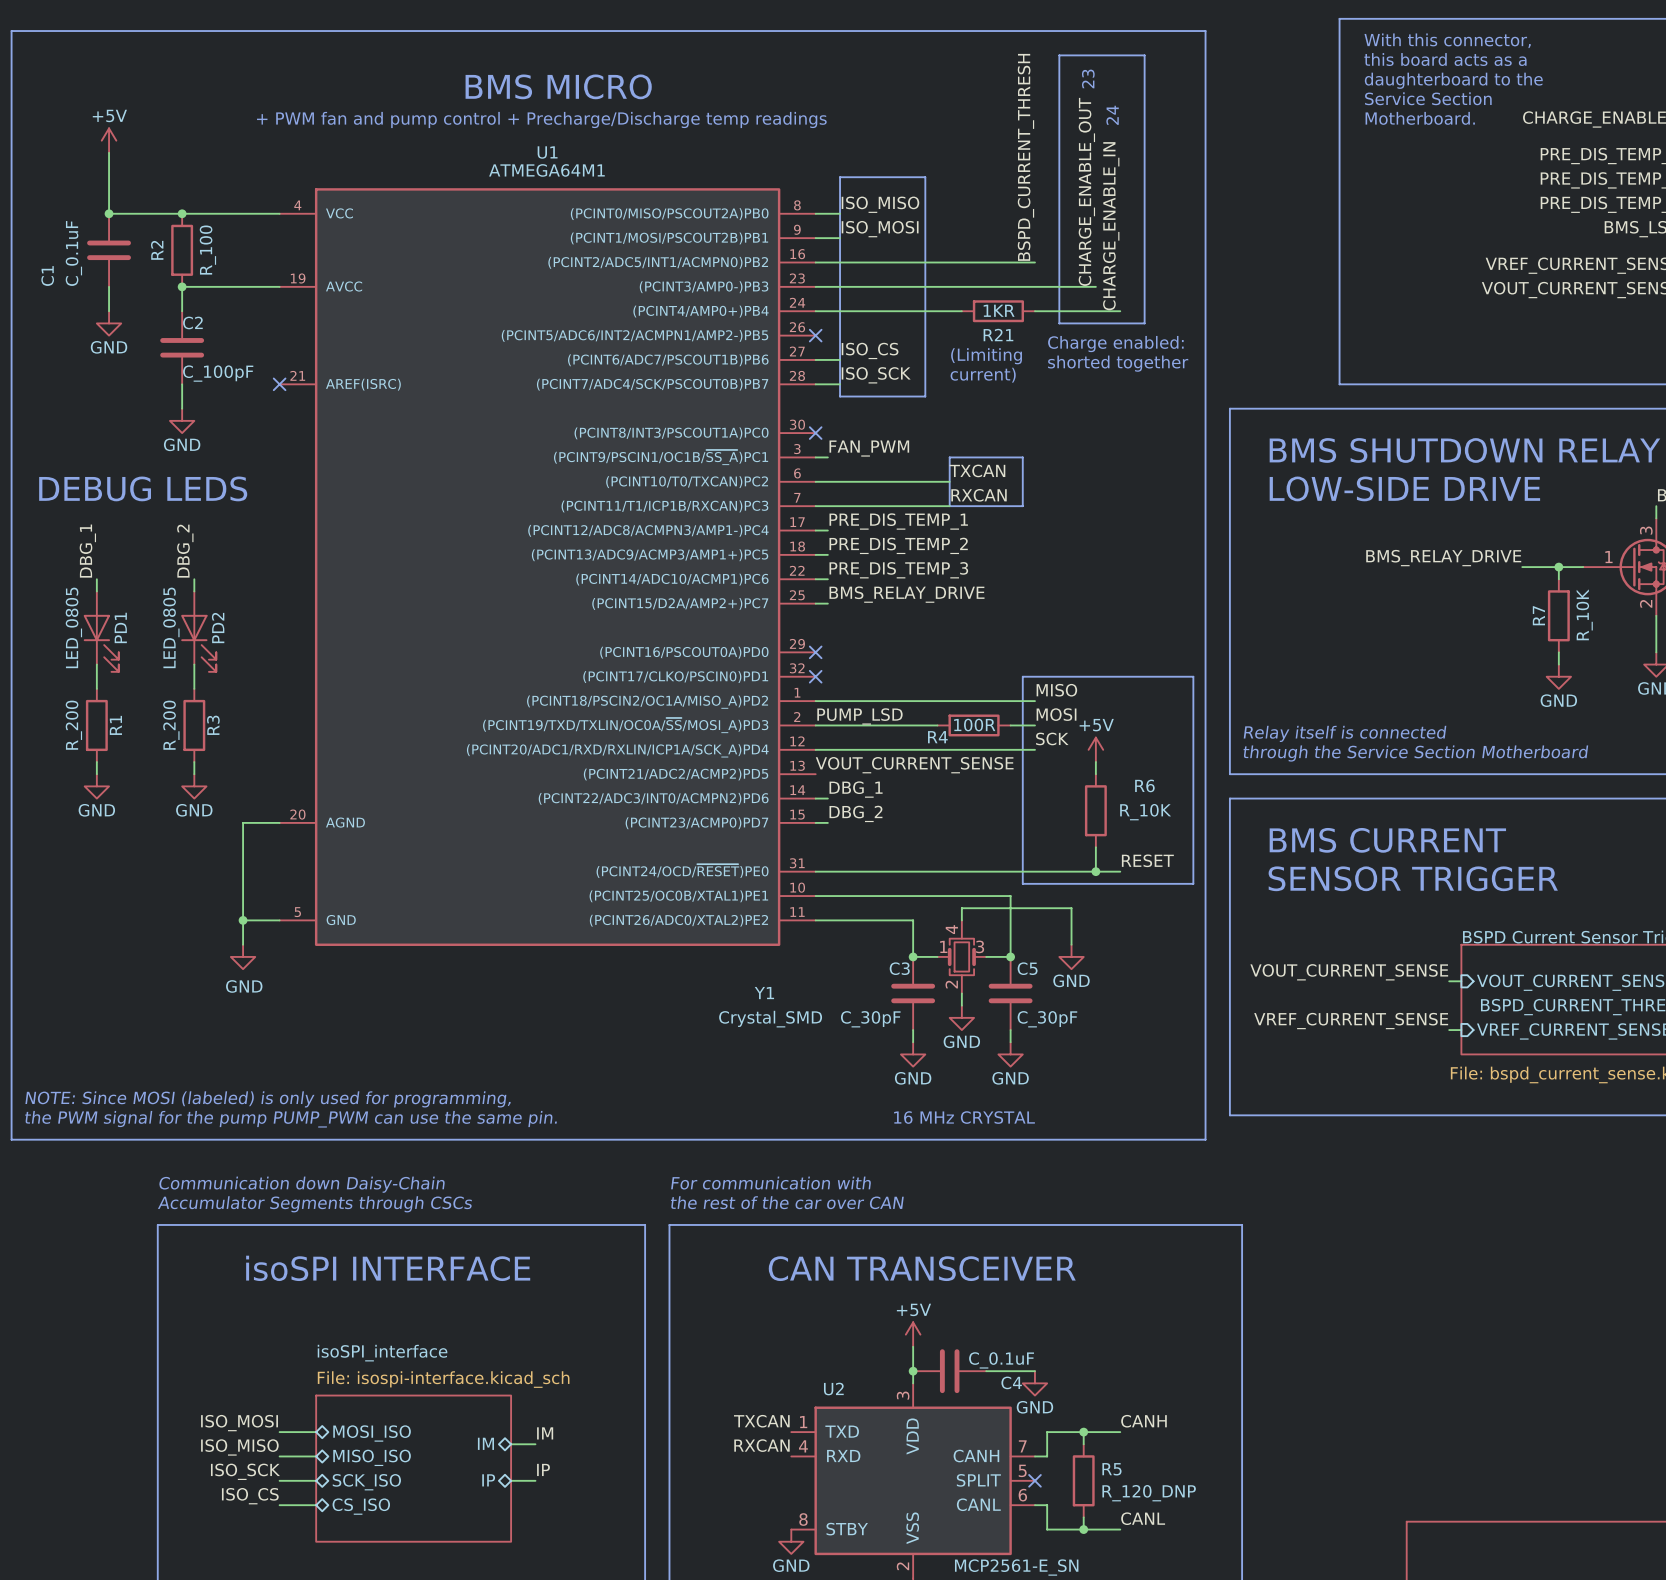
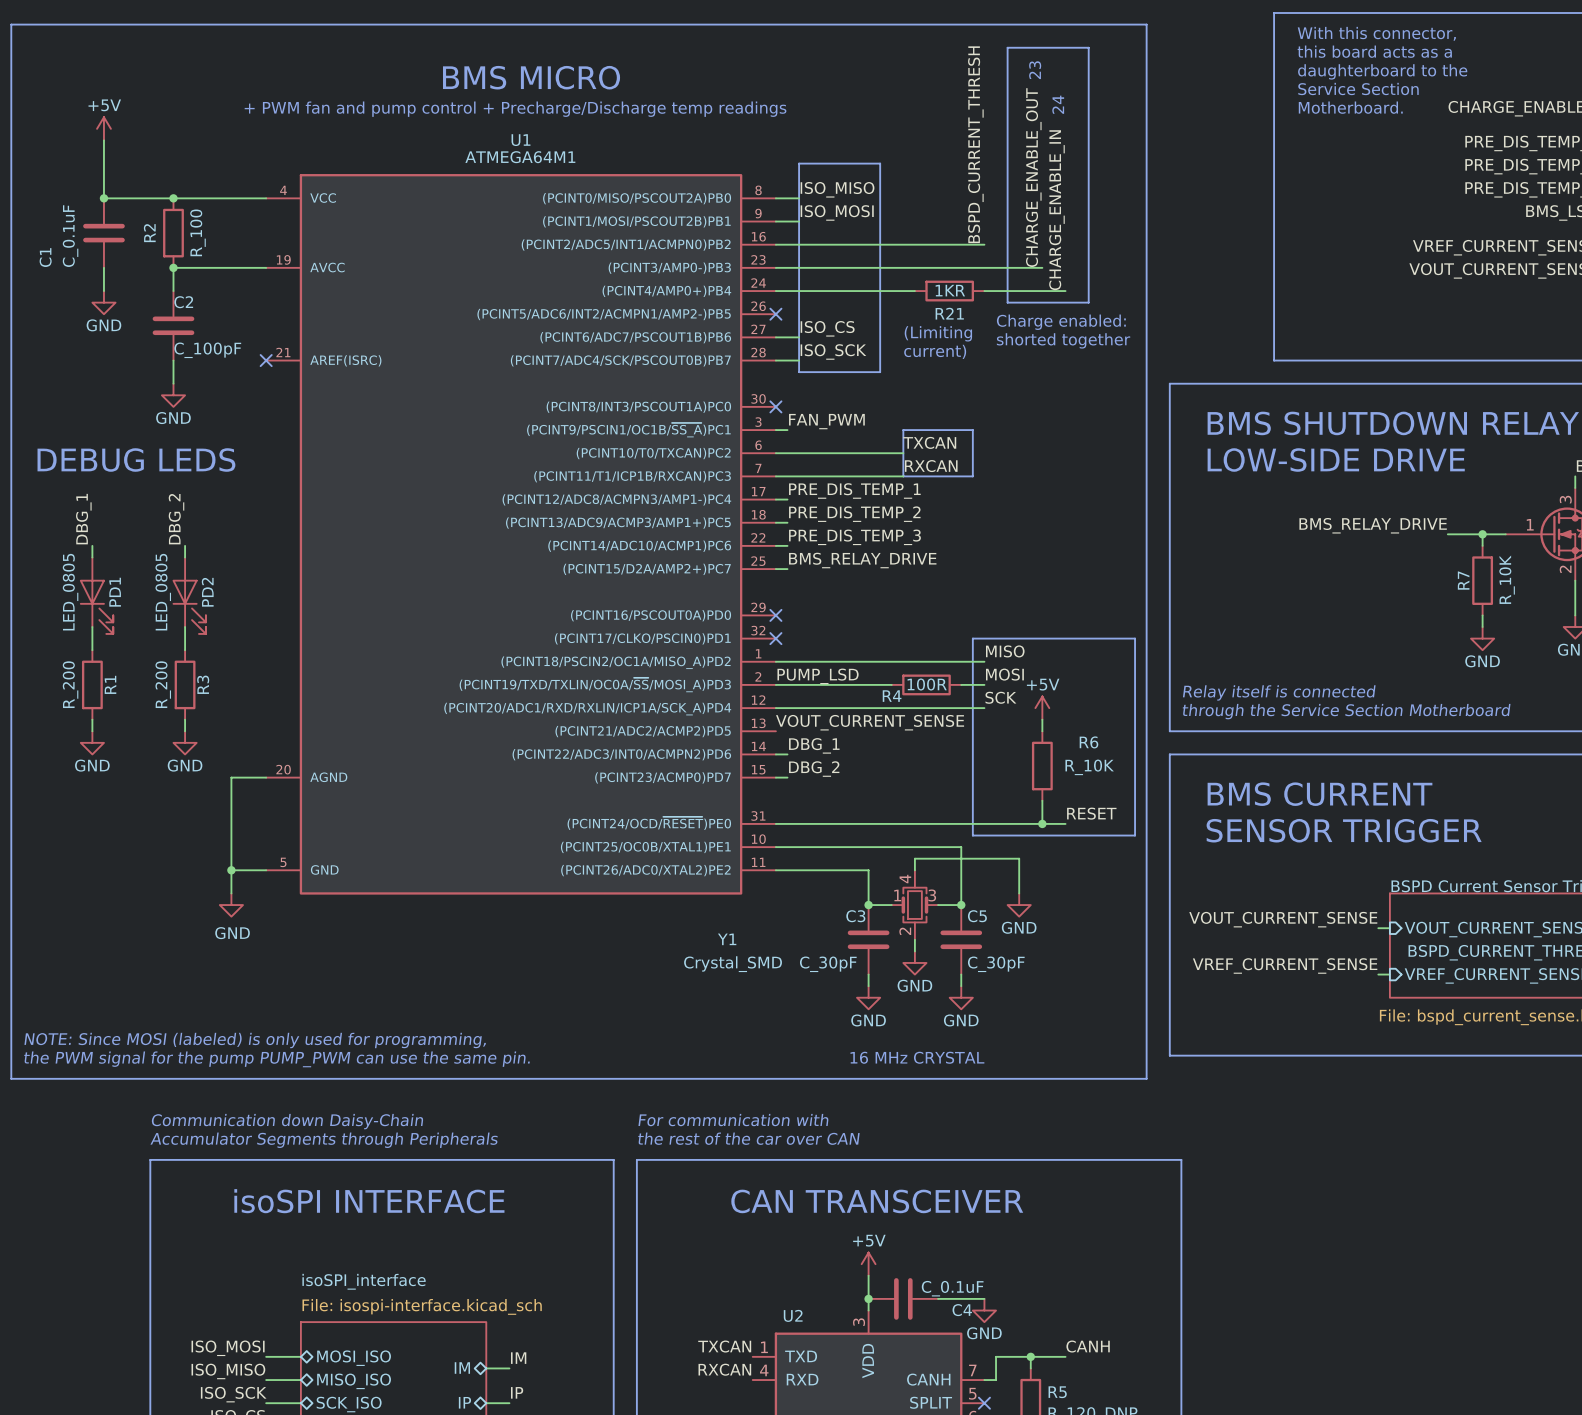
text: Accumulator Segments through CSCs (314, 1204) -> Accumulator Segments through Peripherals (324, 1140)

